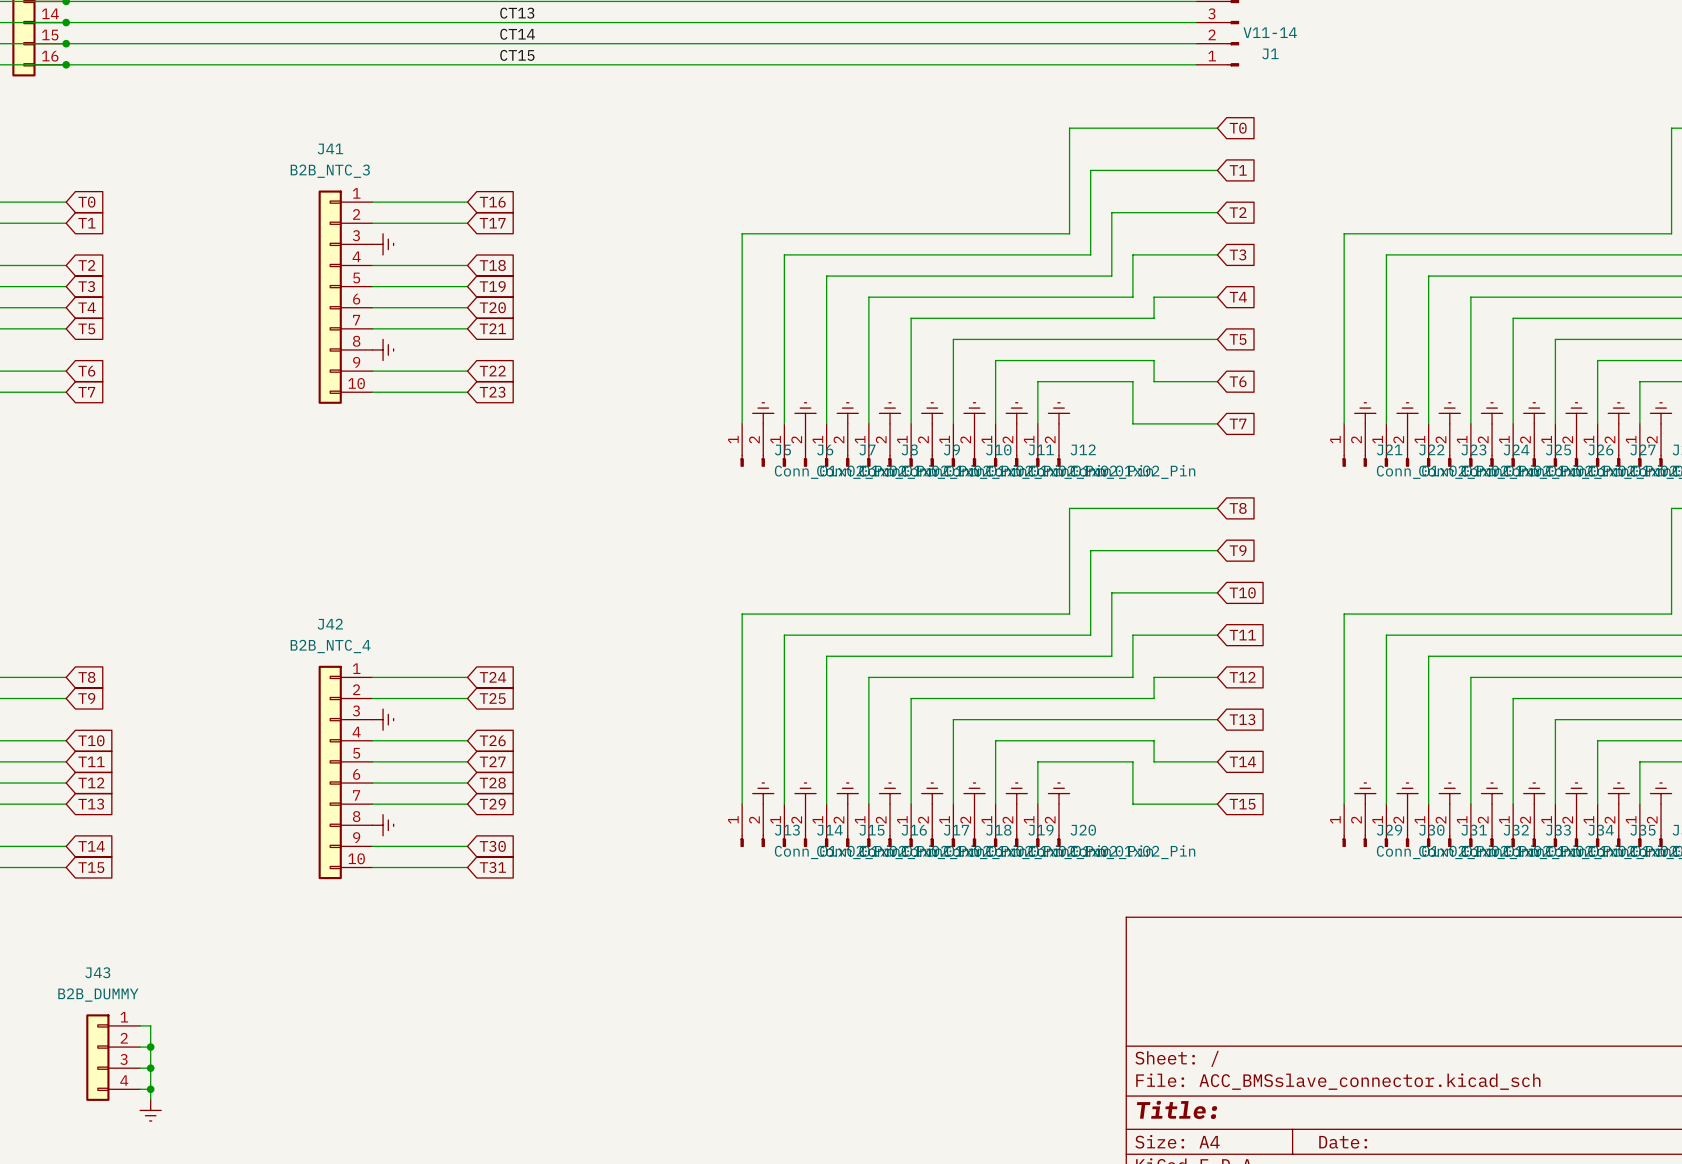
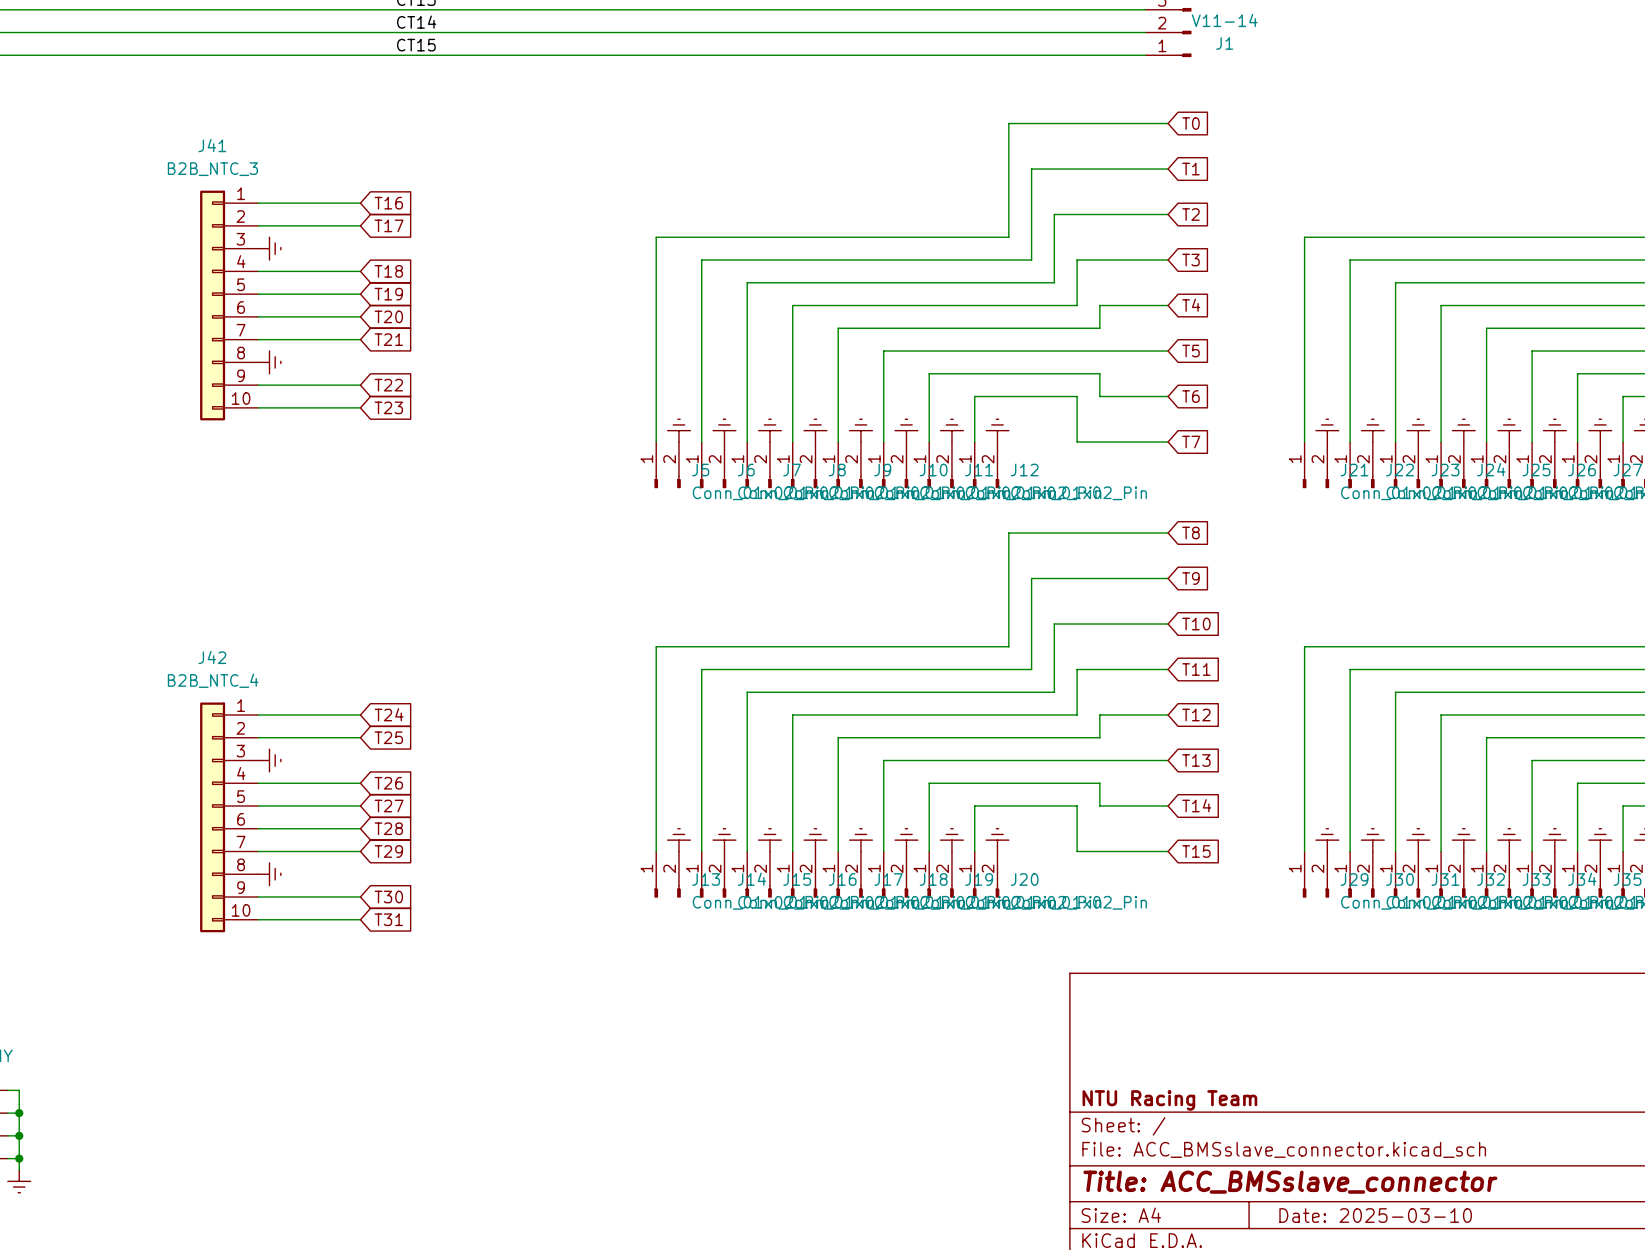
title block: none -> NTU Racing Team (1169, 1100)
title block: Title: (1177, 1109) -> Title: ACC_BMSslave_connector (1290, 1182)
title block: Date: (1343, 1142) -> Date: 2025-03-10 (1375, 1215)

